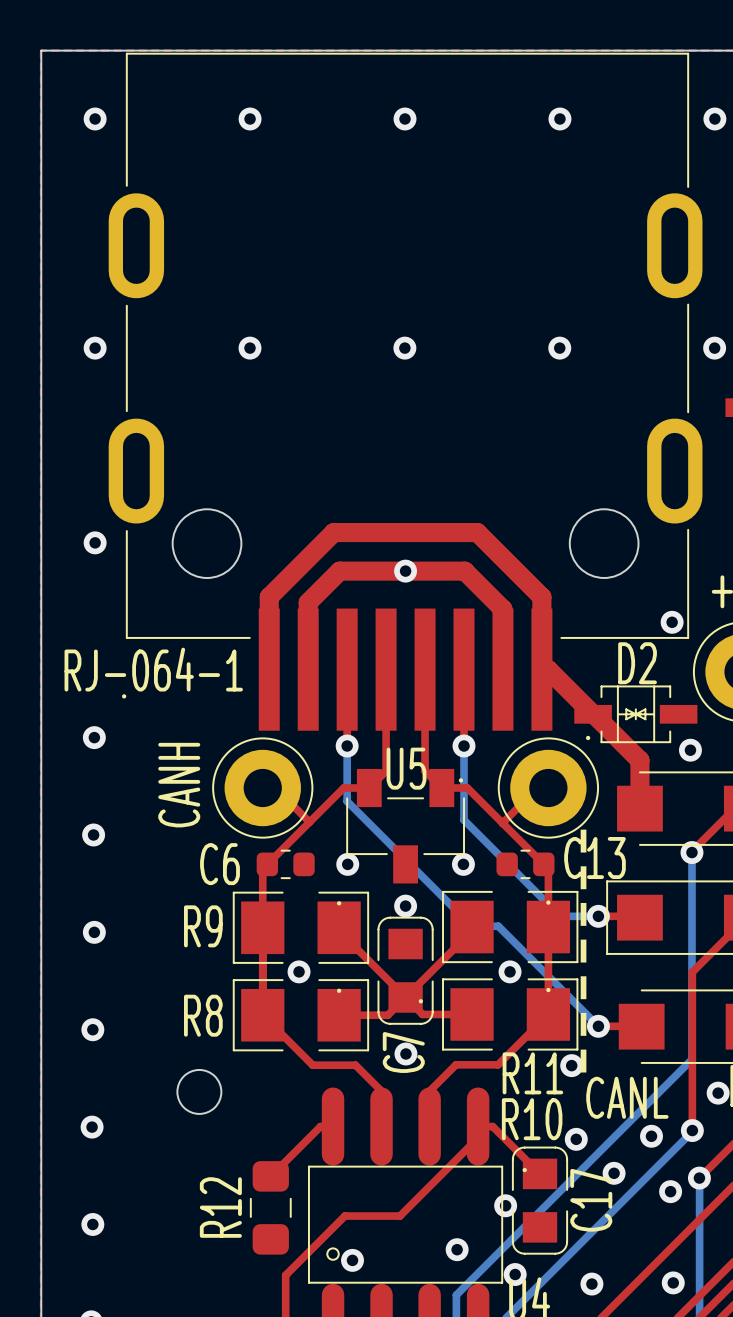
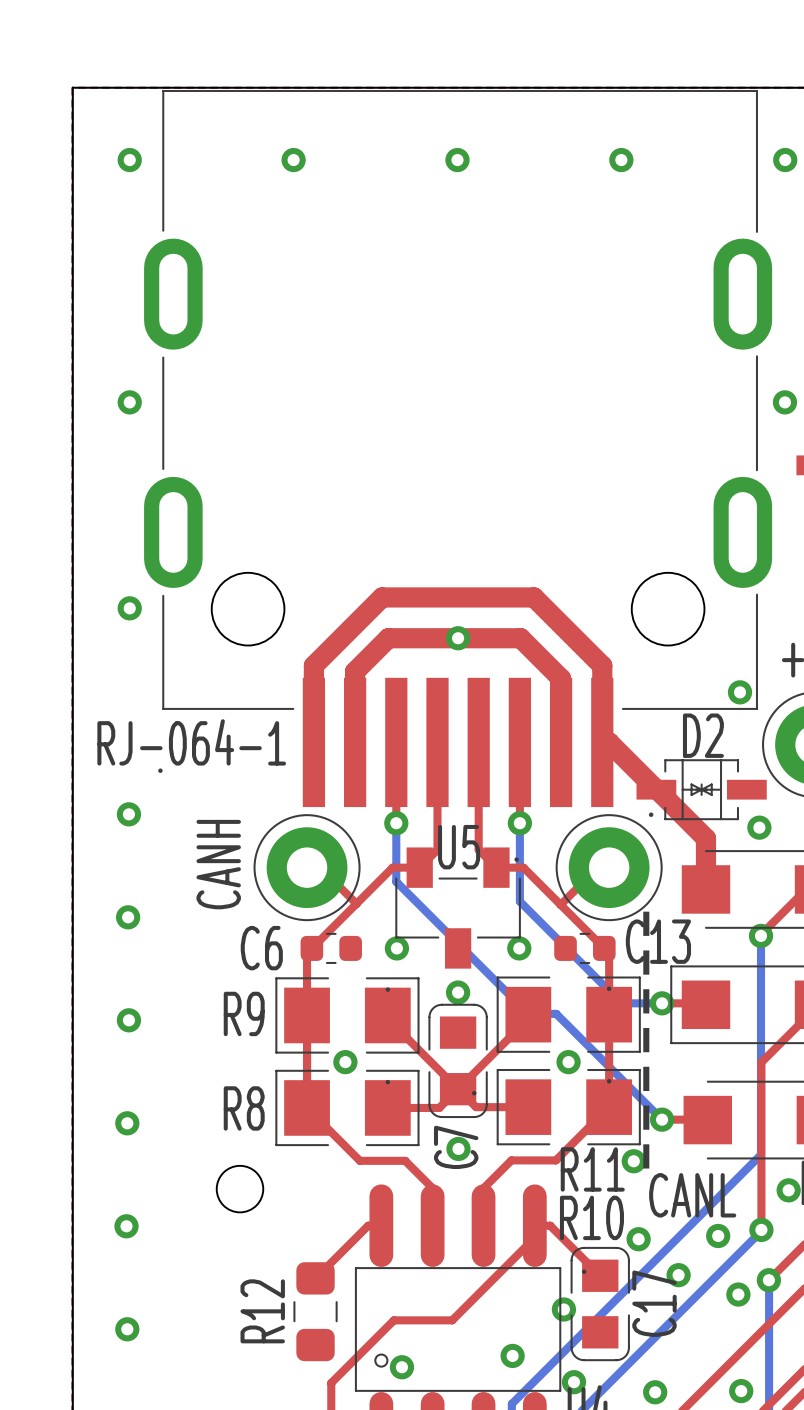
via: (250, 348) -> none
via: (404, 348) -> none
via: (559, 348) -> none

